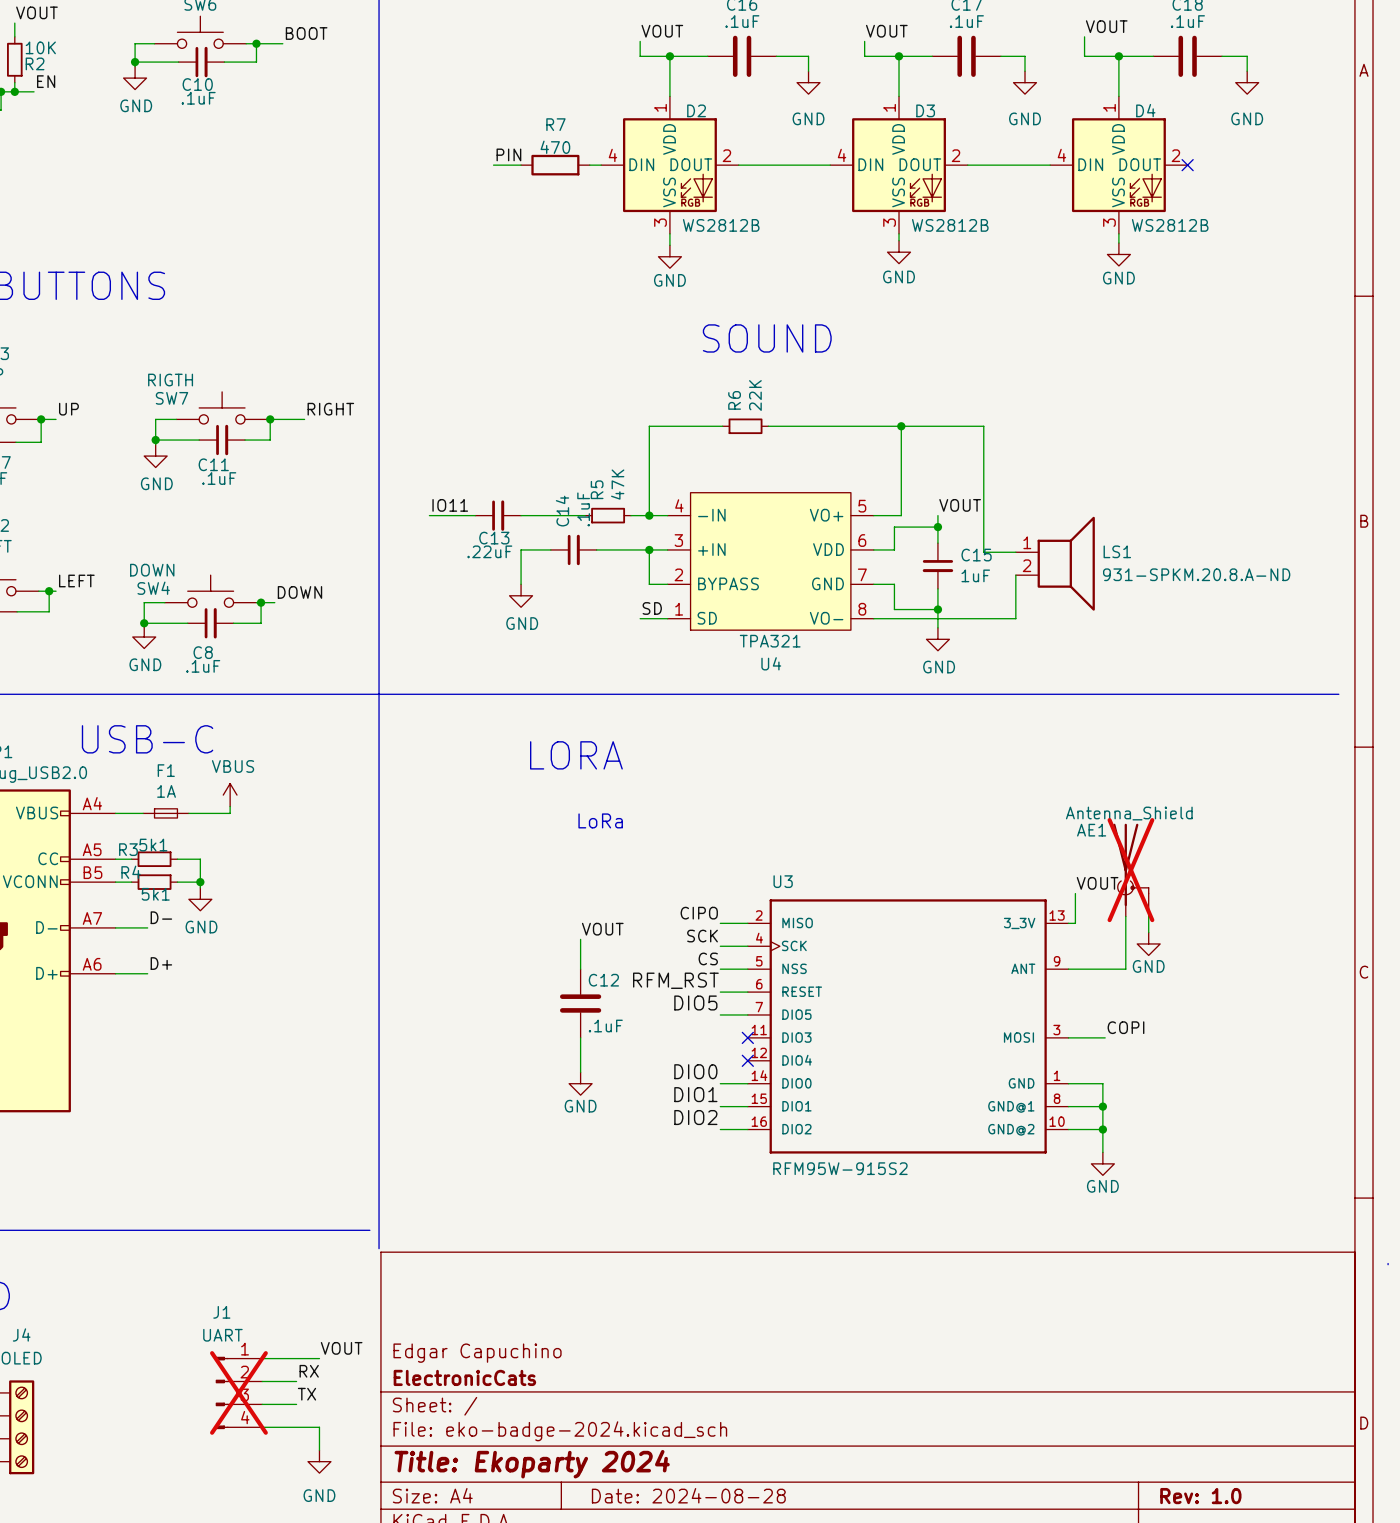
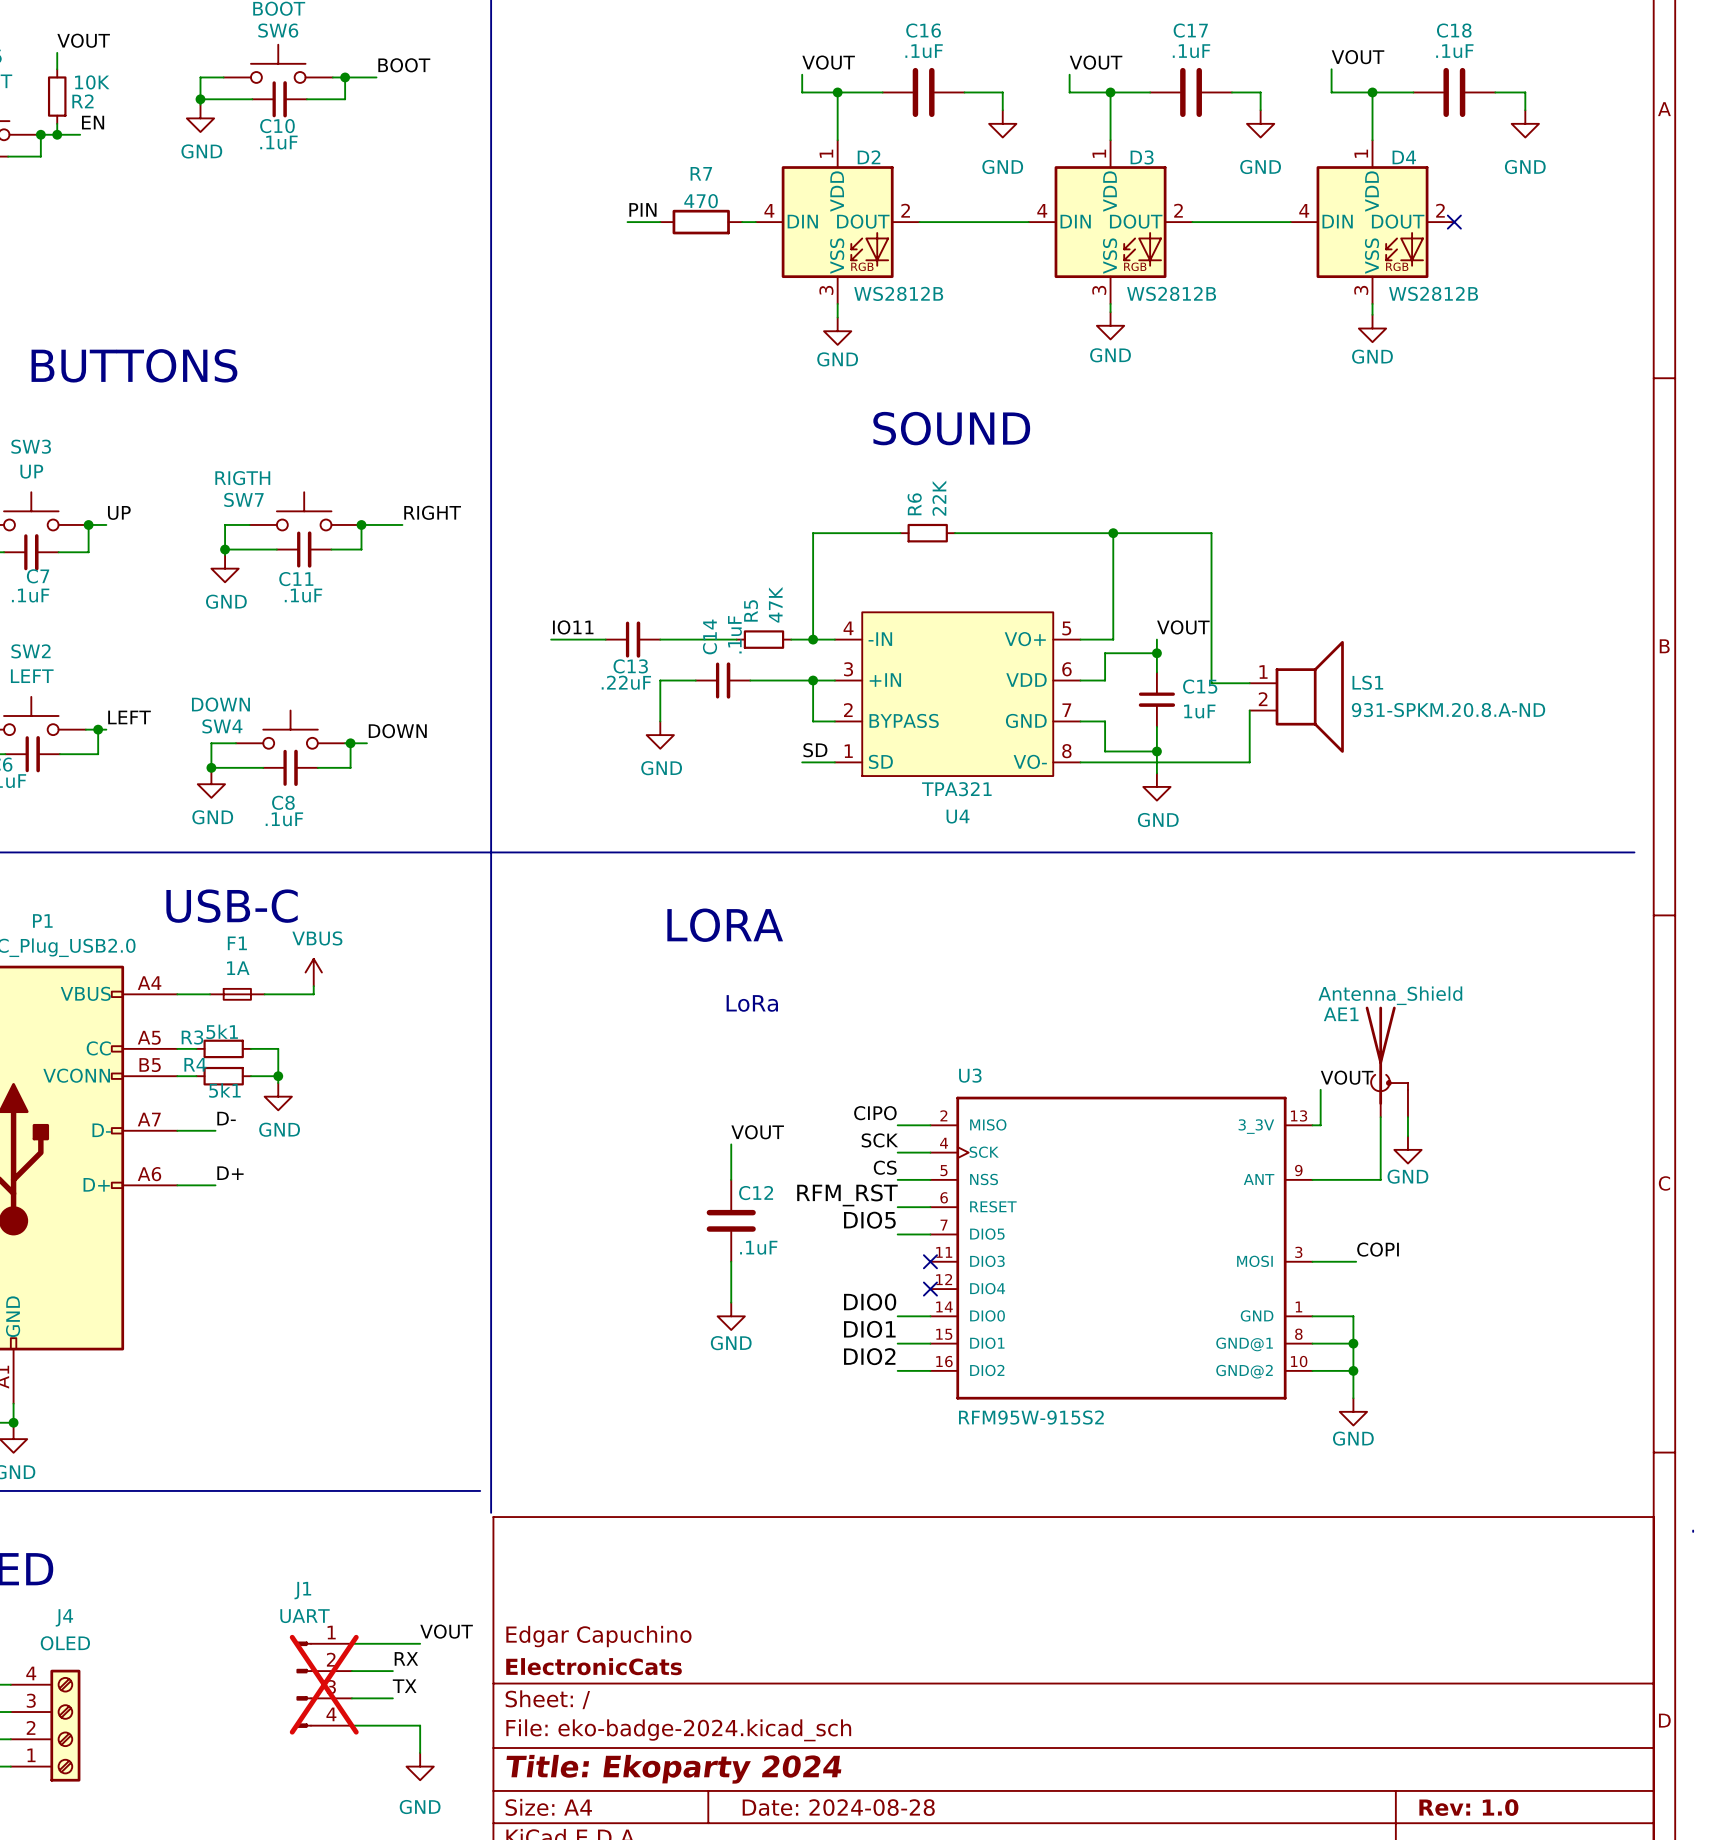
AE1 do-not-place cross: (1130, 870) -> none

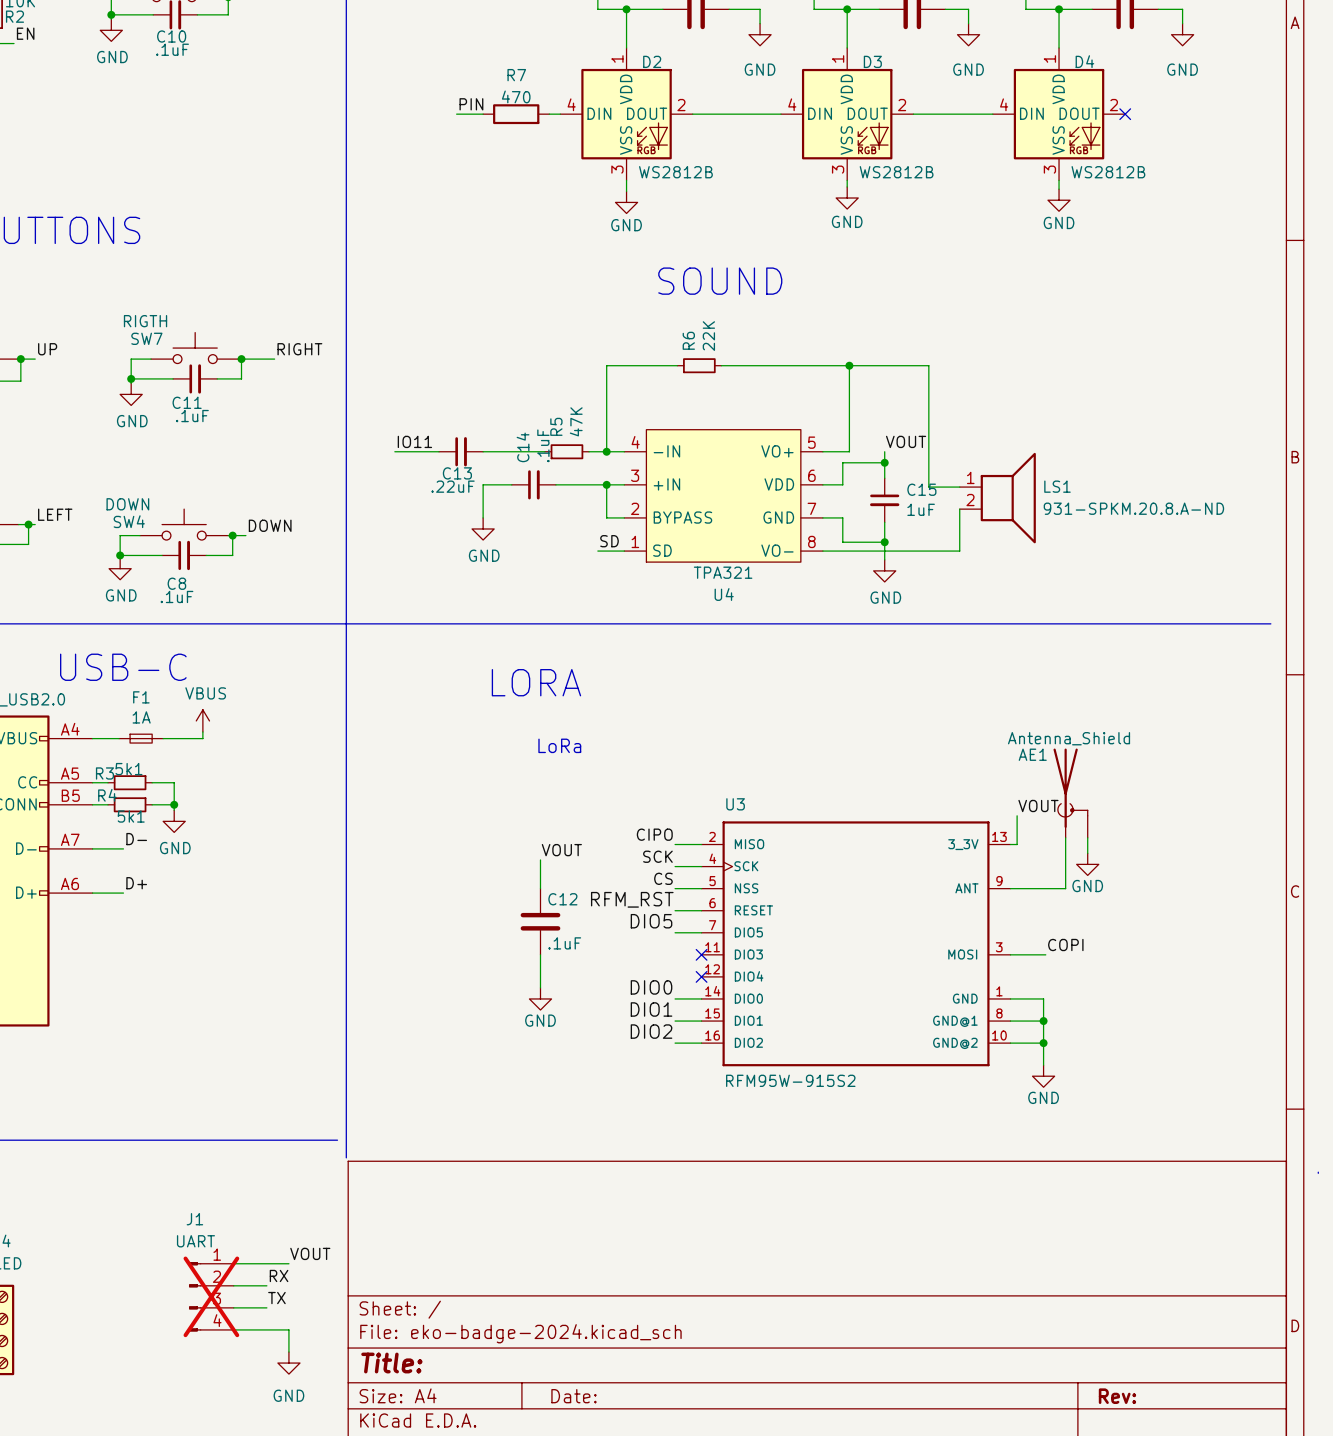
title block: Edgar Capuchino (598, 1636) -> none
title block: ElectronicCats (594, 1666) -> none
title block: Title: Ekoparty 2024 (673, 1769) -> Title: (391, 1363)
title block: Date: 2024-08-28 (838, 1807) -> Date: (573, 1396)
title block: Rev: 1.0 (1468, 1807) -> Rev: (1117, 1396)

